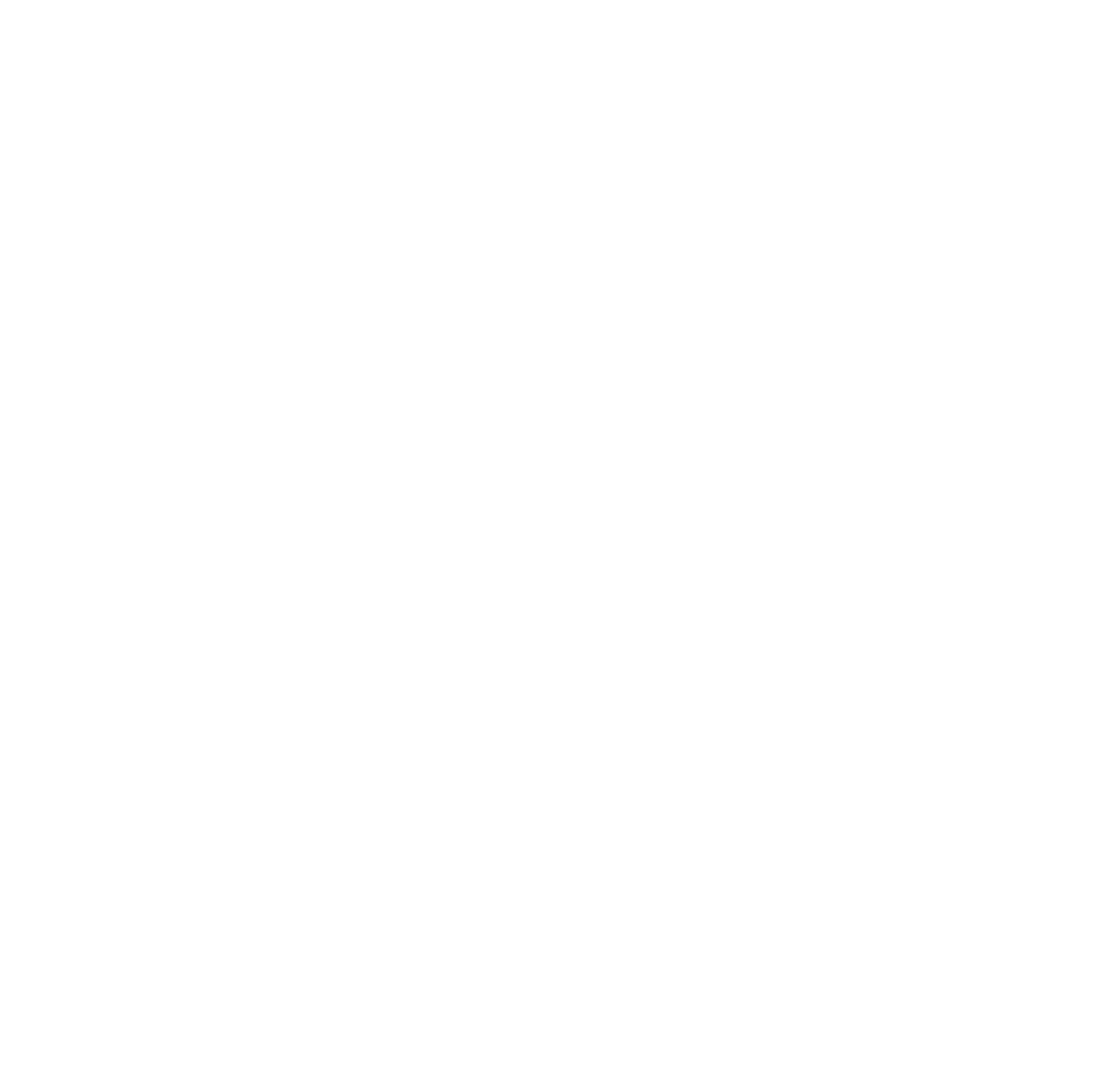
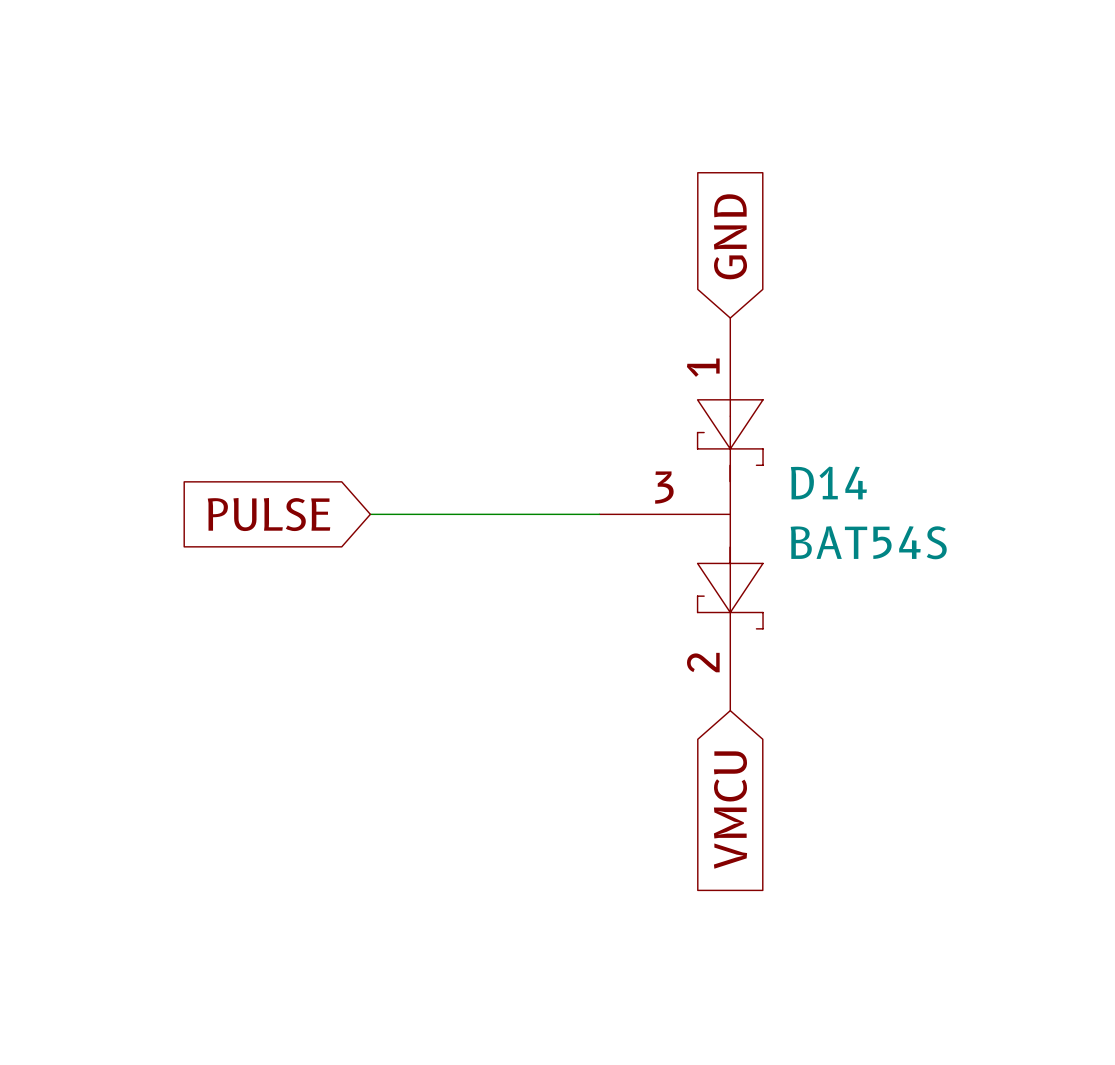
global label: none -> GND (730, 236)
global label: none -> PULSE (269, 514)
wire: none -> (370, 514) (599, 514)
D14: none -> BAT54S (681, 514)
global label: none -> VMCU (730, 810)

